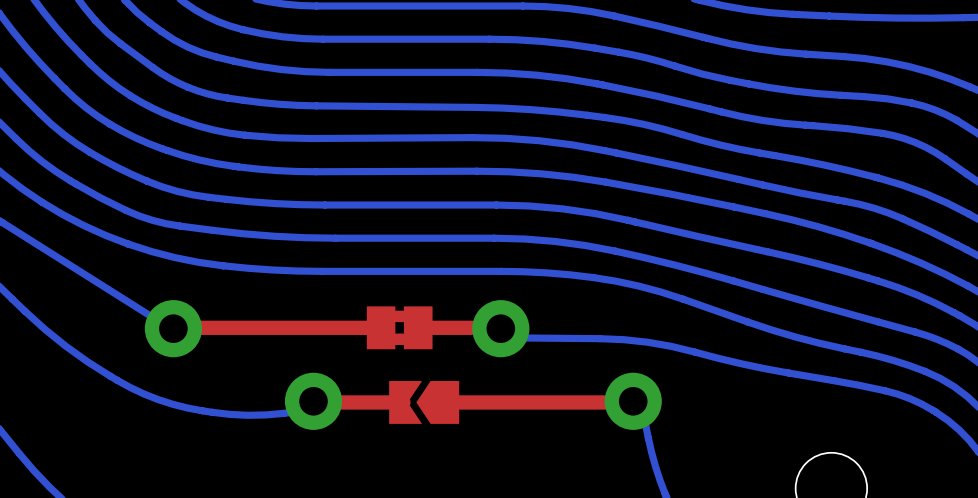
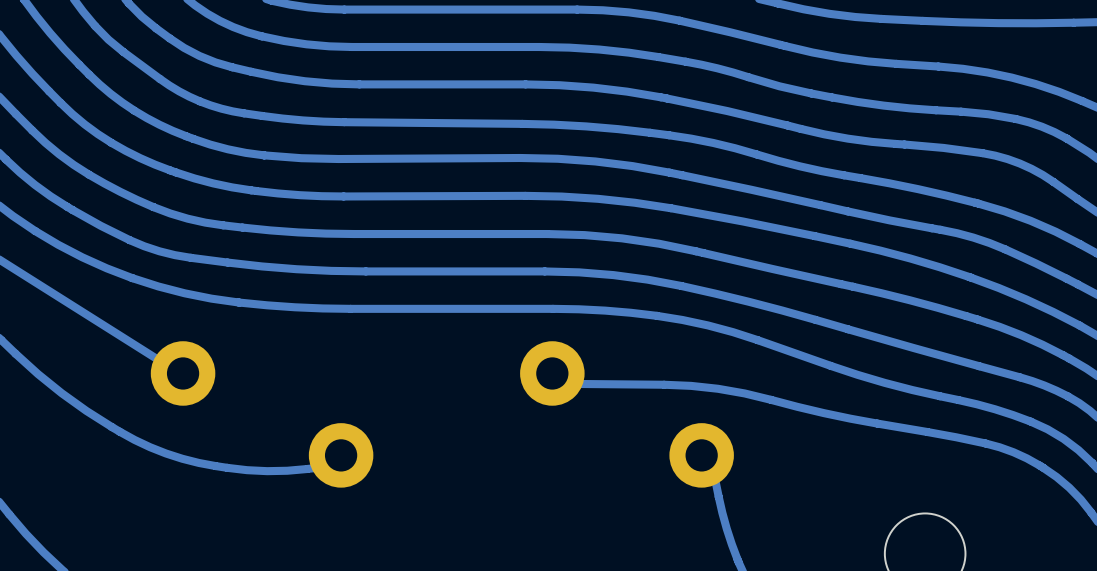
top track: (381, 327) (200, 327) -> none
part: (399, 327) -> none
top track: (471, 327) (418, 327) -> none
top track: (403, 402) (341, 402) -> none
part: (424, 402) -> none
top track: (612, 402) (444, 402) -> none

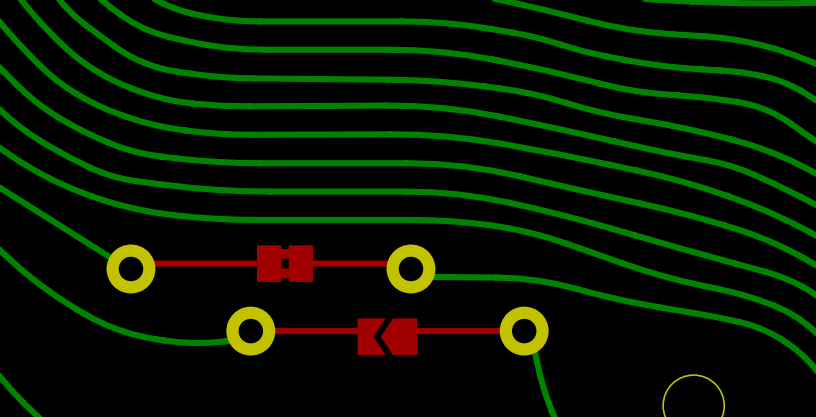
top track: none -> (269, 263) (136, 263)
part: none -> (285, 263)
top track: none -> (405, 263) (300, 263)
top track: none -> (250, 331) (364, 331) (369, 336)
top track: none -> (524, 331) (410, 331) (405, 336)
part: none -> (387, 336)

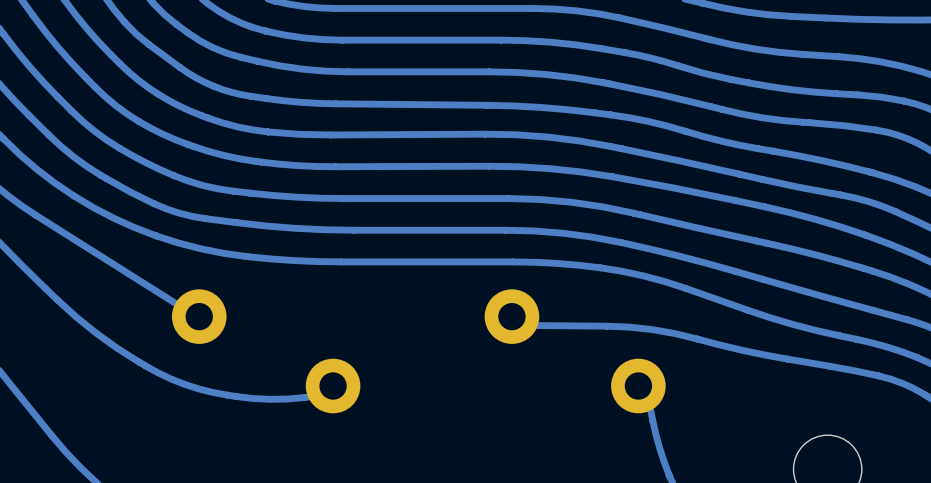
top track: (269, 263) (136, 263) -> none
part: (285, 263) -> none
top track: (405, 263) (300, 263) -> none
top track: (250, 331) (364, 331) (369, 336) -> none
top track: (524, 331) (410, 331) (405, 336) -> none
part: (387, 336) -> none

